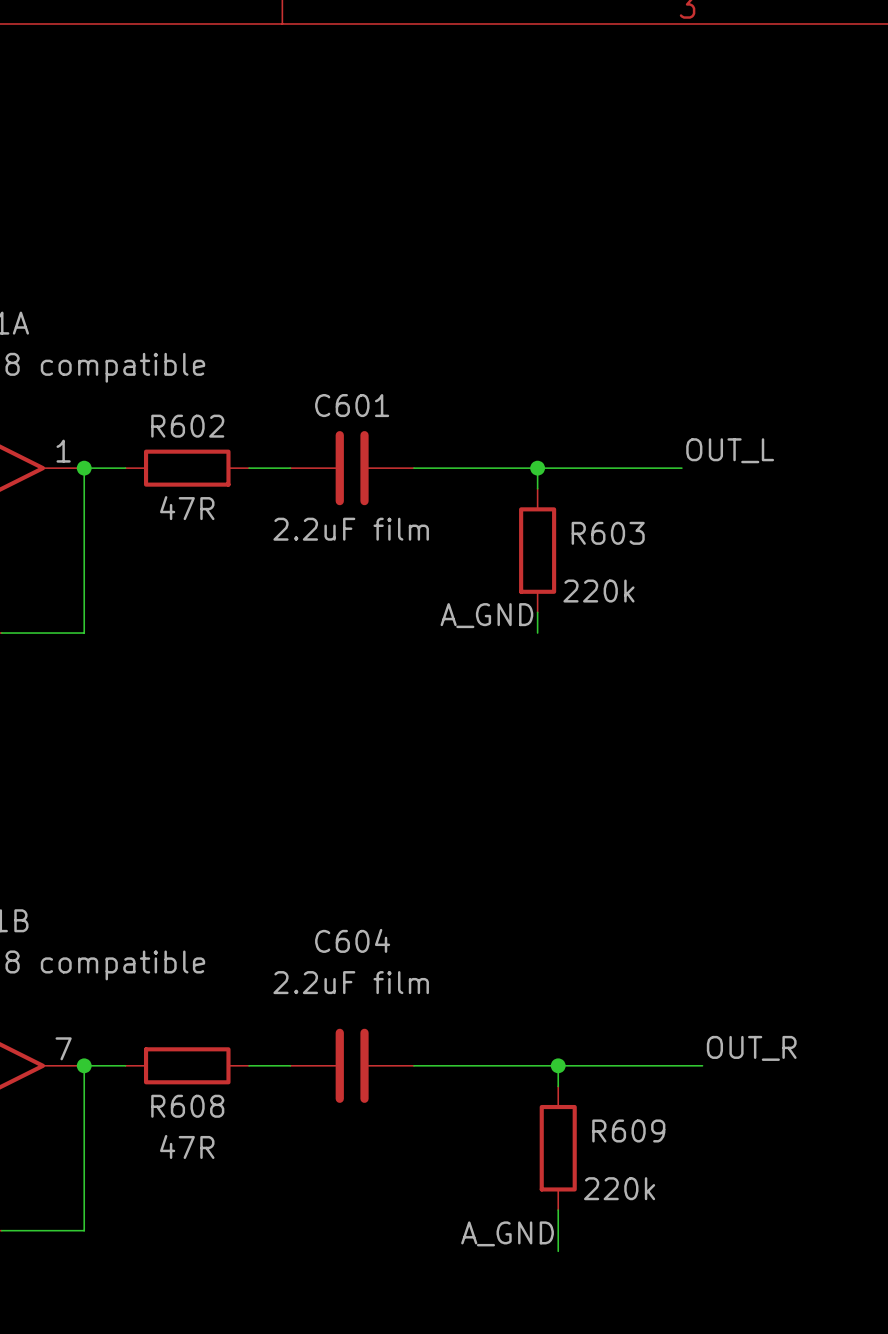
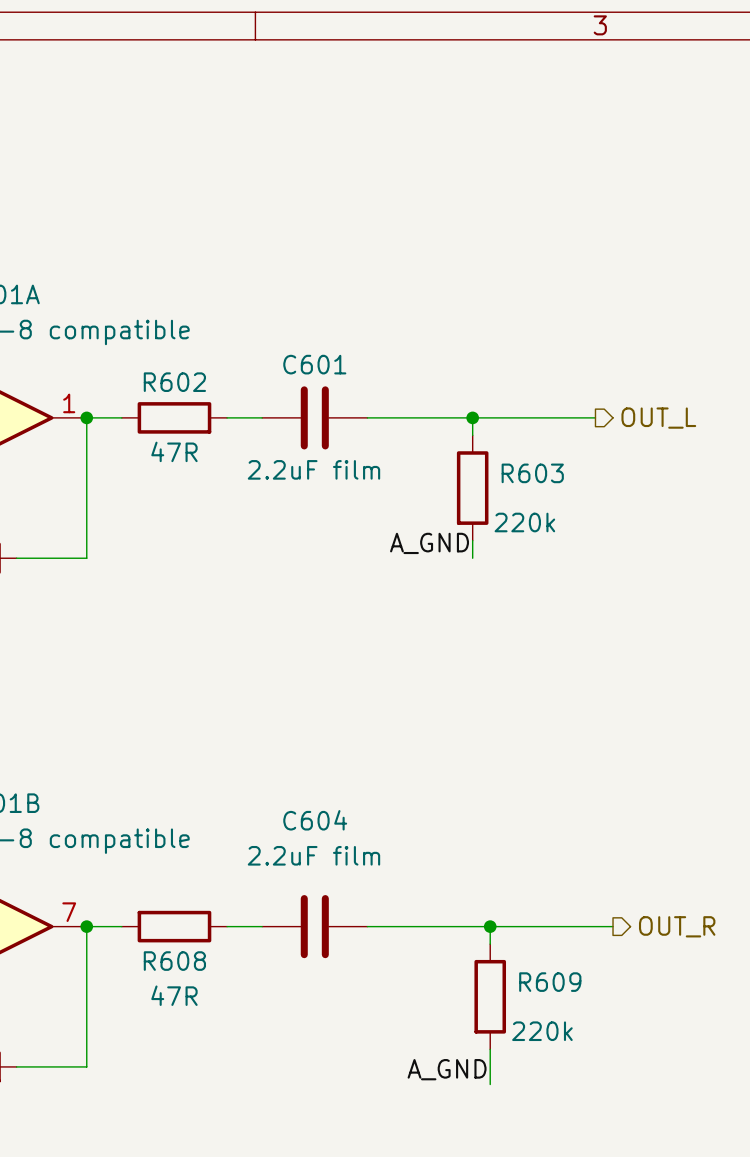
label: OUT_L (730, 450) -> none
hierarchical label: none -> OUT_L (658, 418)
label: OUT_R (751, 1048) -> none
hierarchical label: none -> OUT_R (677, 926)

